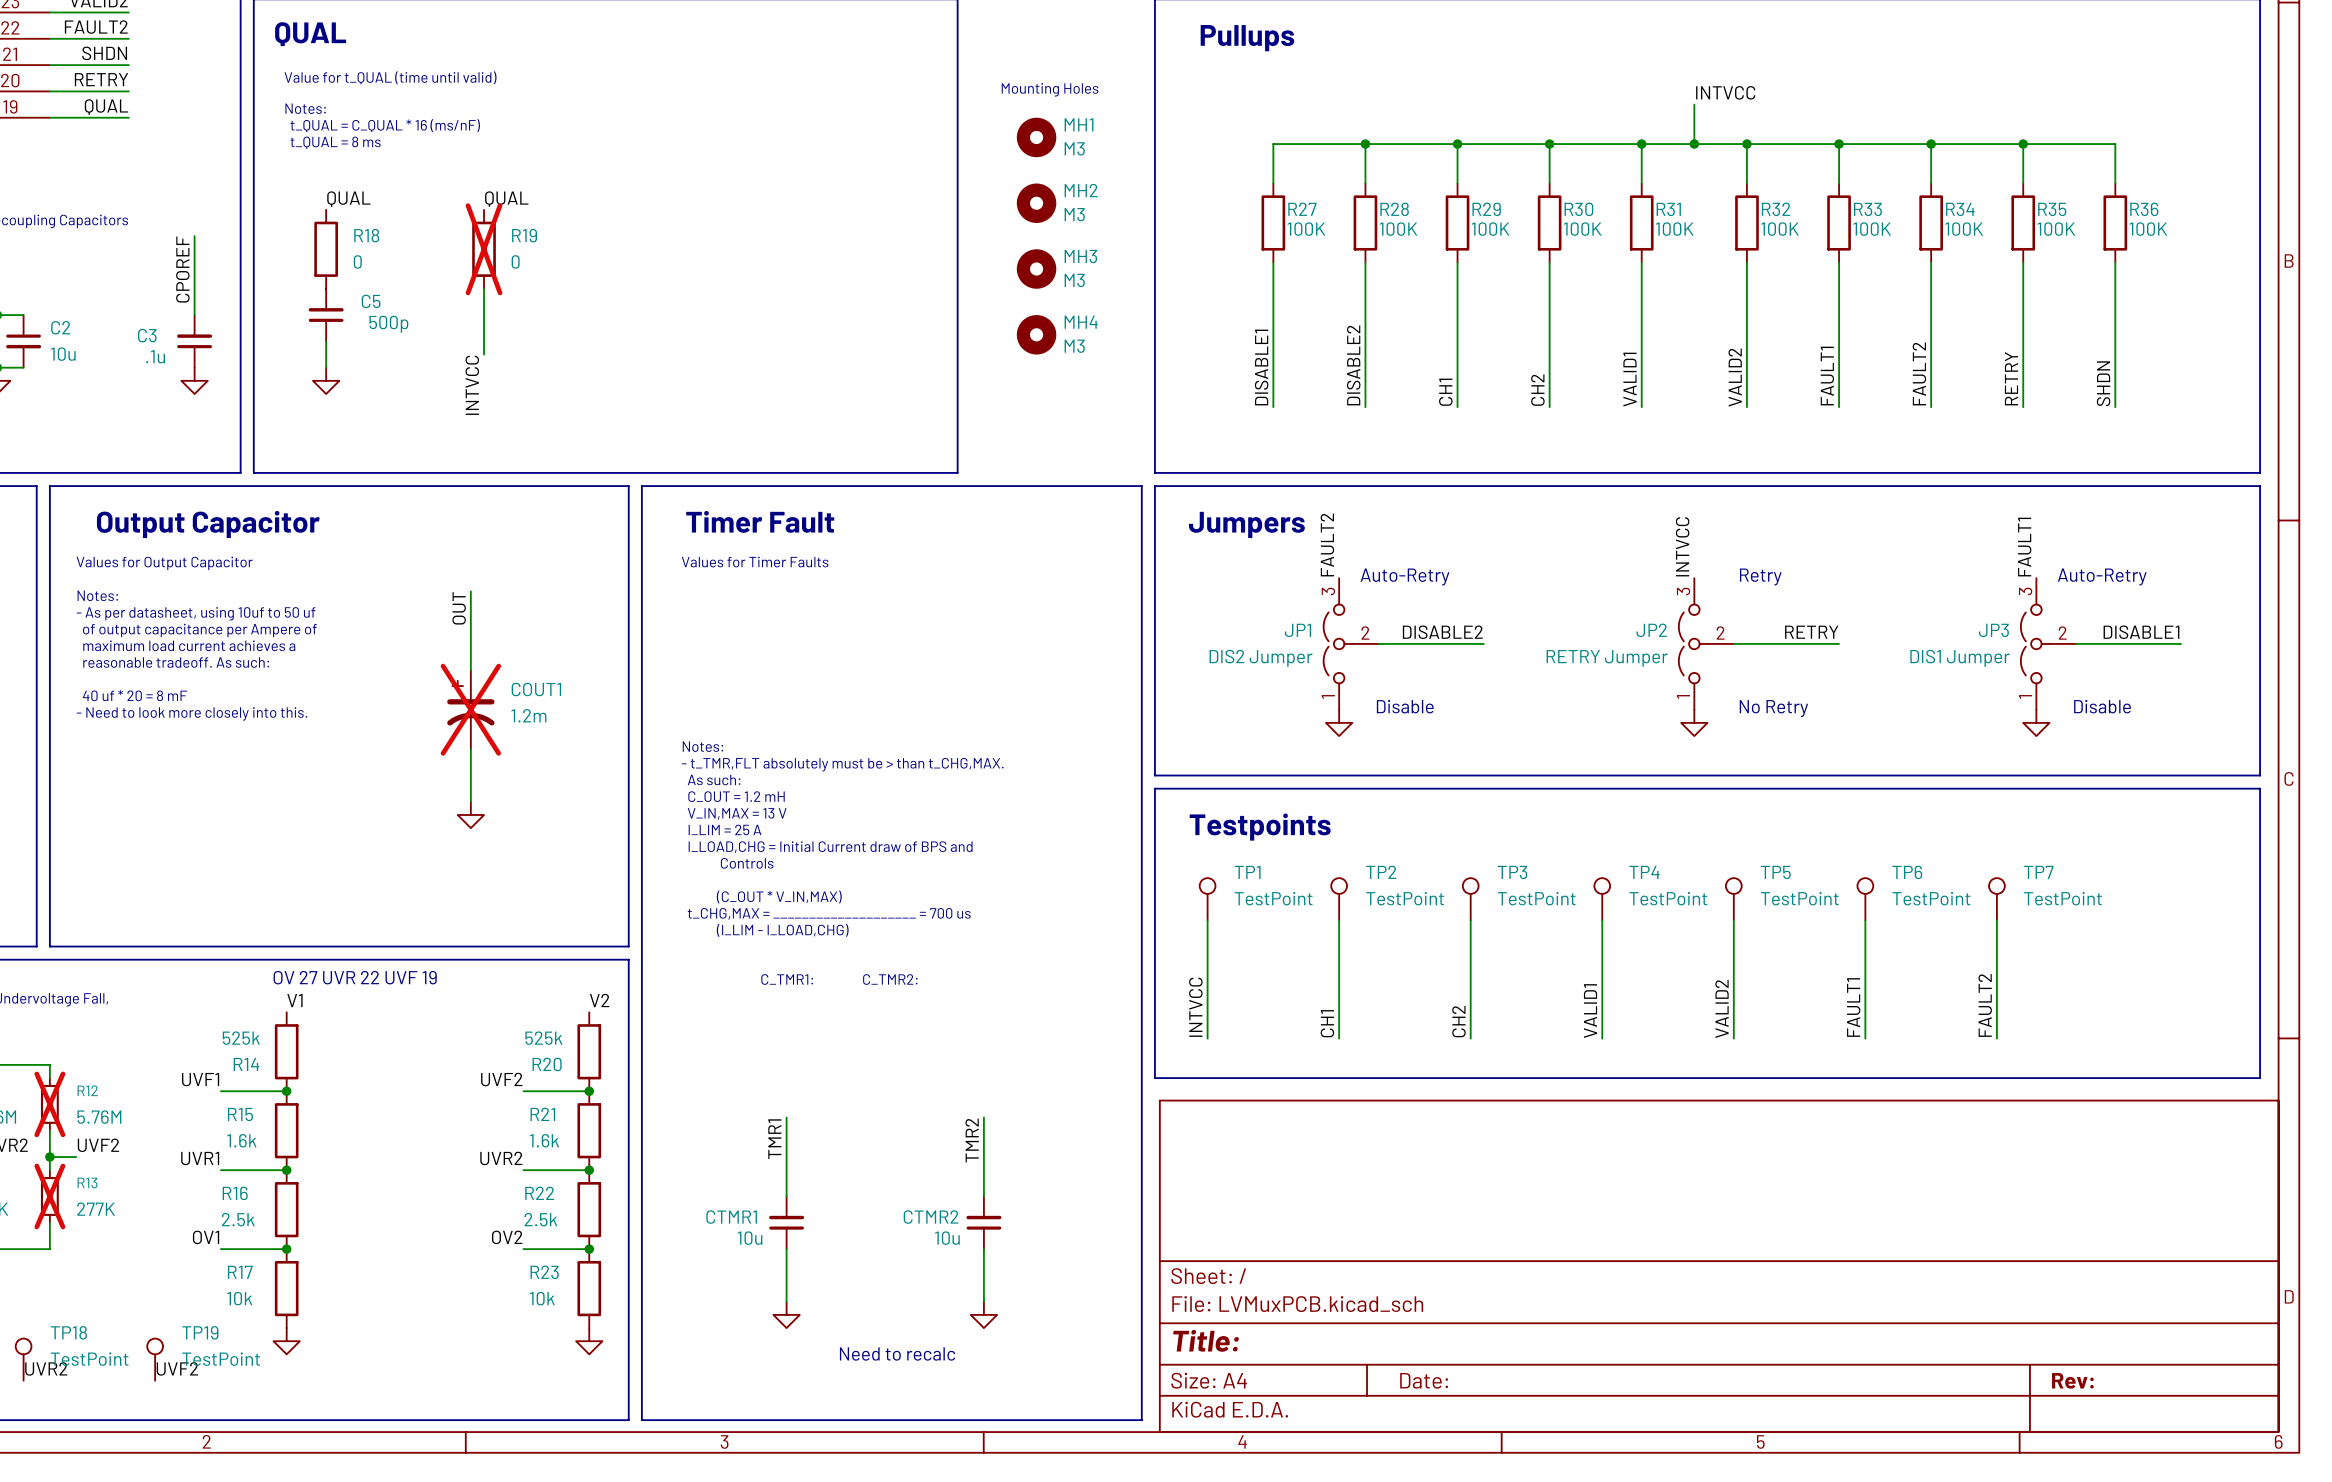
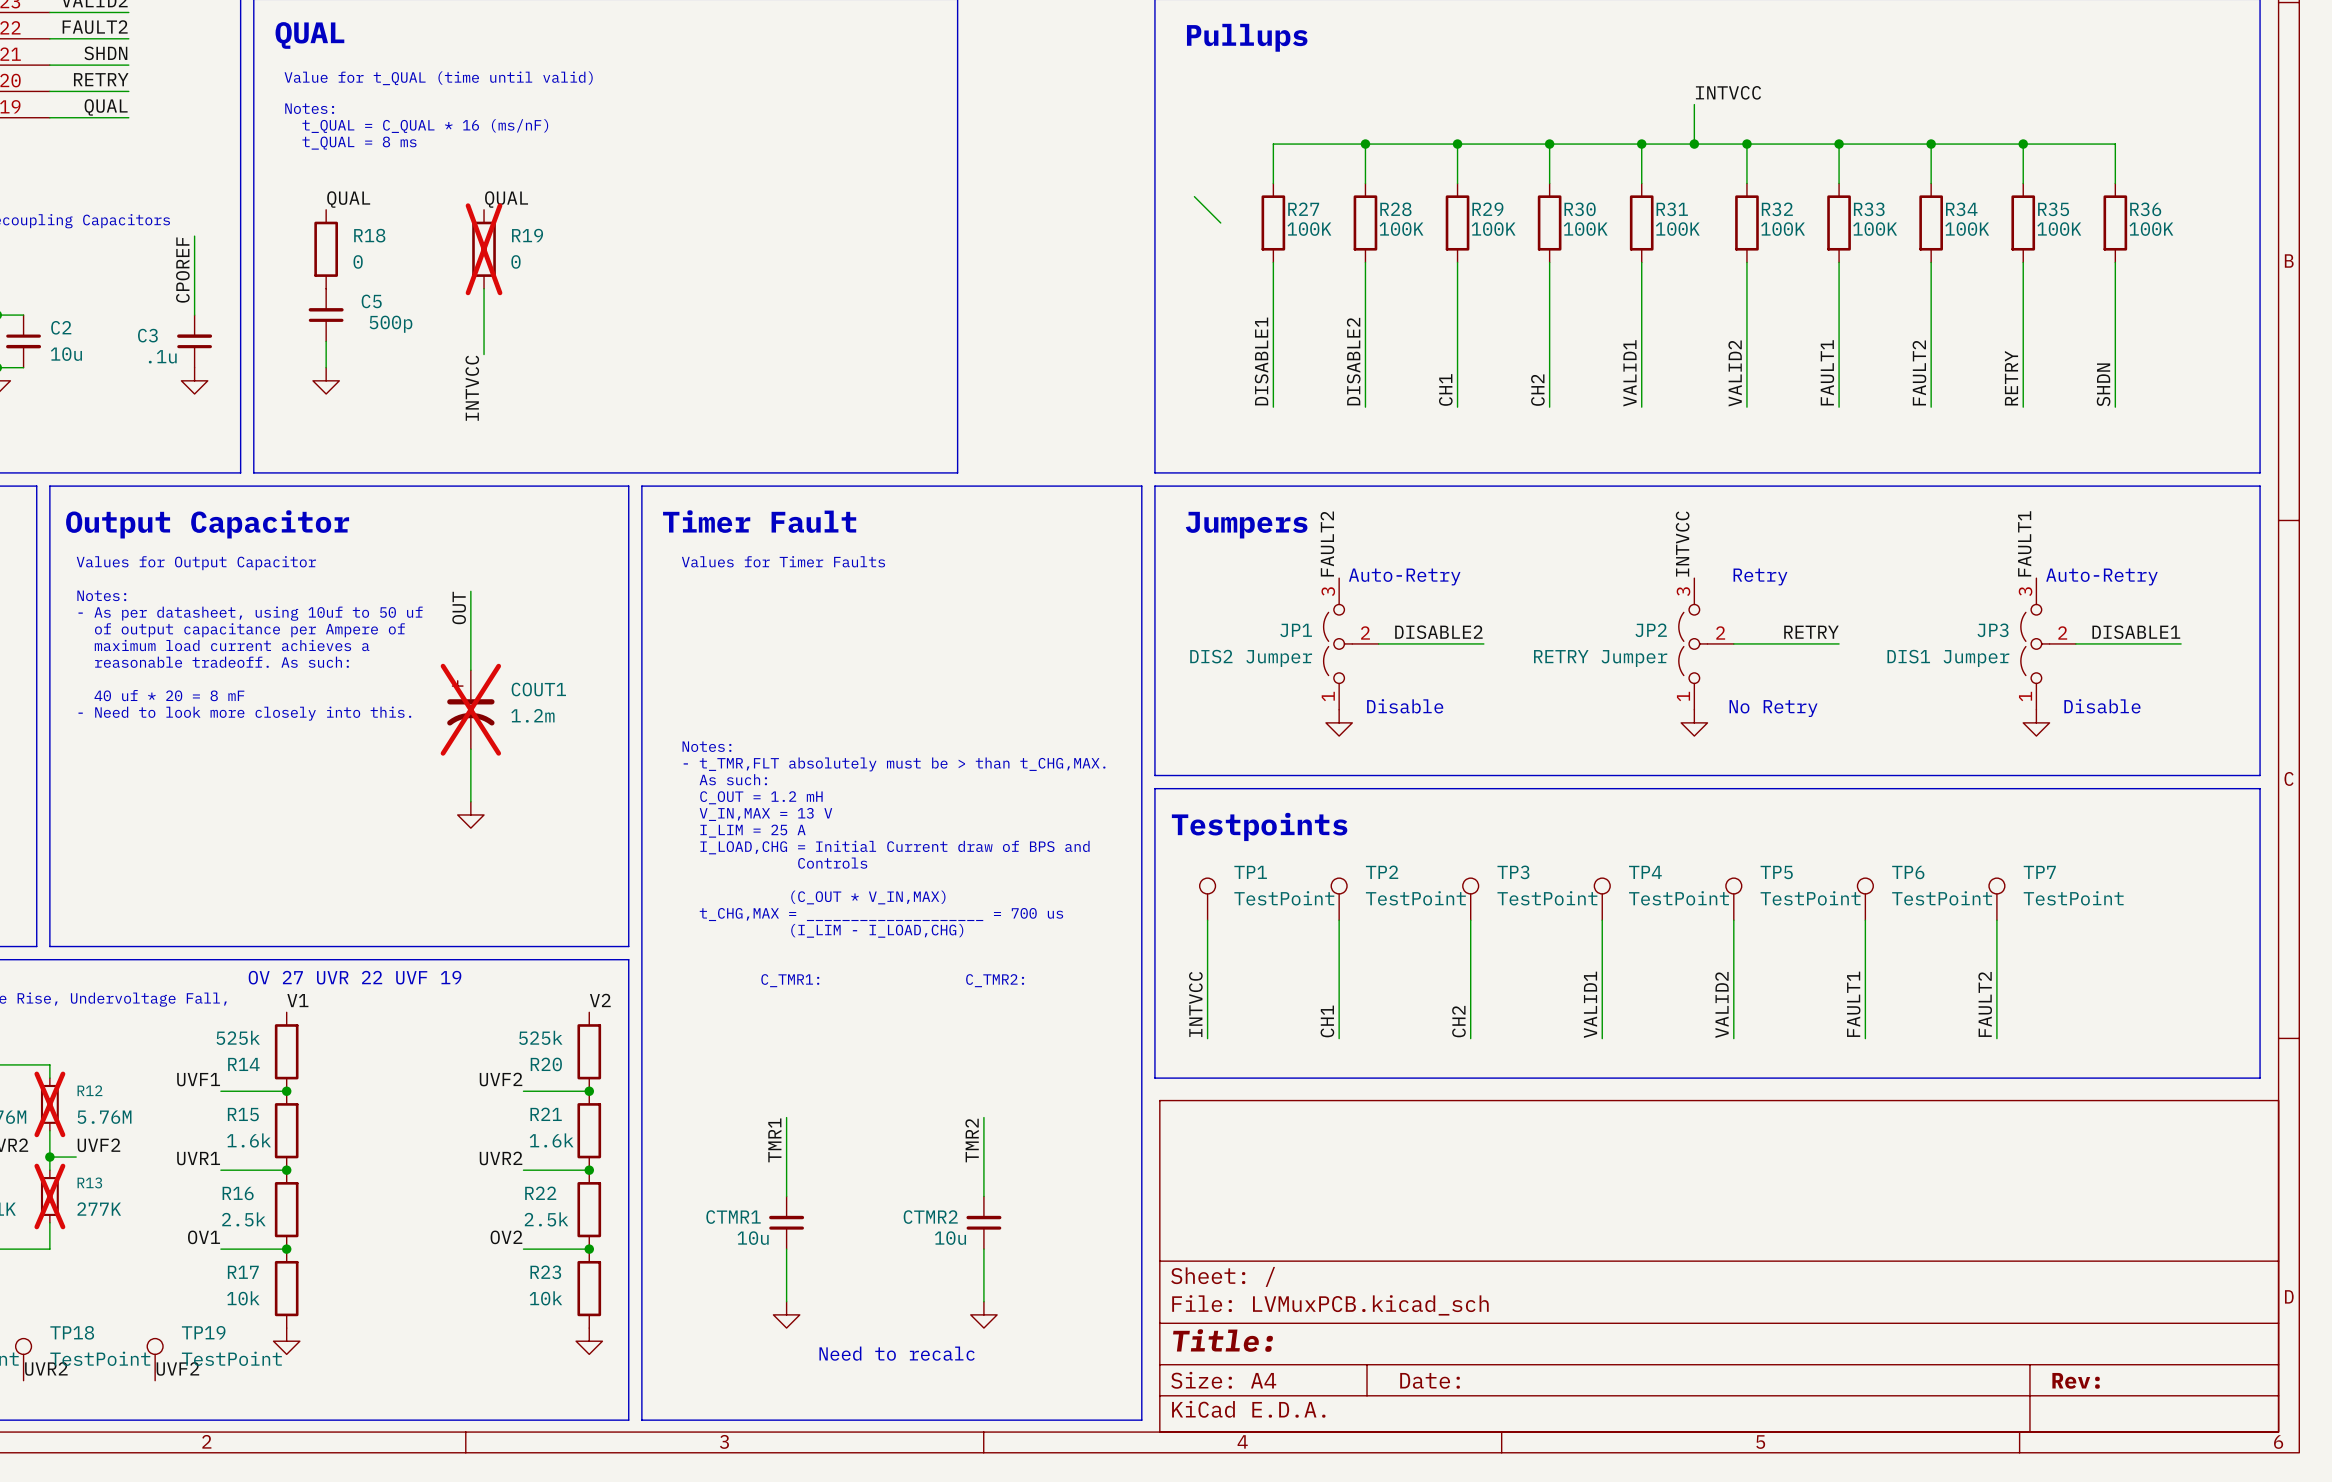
text: Mounting Holes (1050, 89) -> none
MH1: M3 (1036, 137) -> none
wire: none -> (1194, 196) (1220, 222)
MH2: M3 (1036, 203) -> none
MH3: M3 (1036, 269) -> none
MH4: M3 (1036, 334) -> none

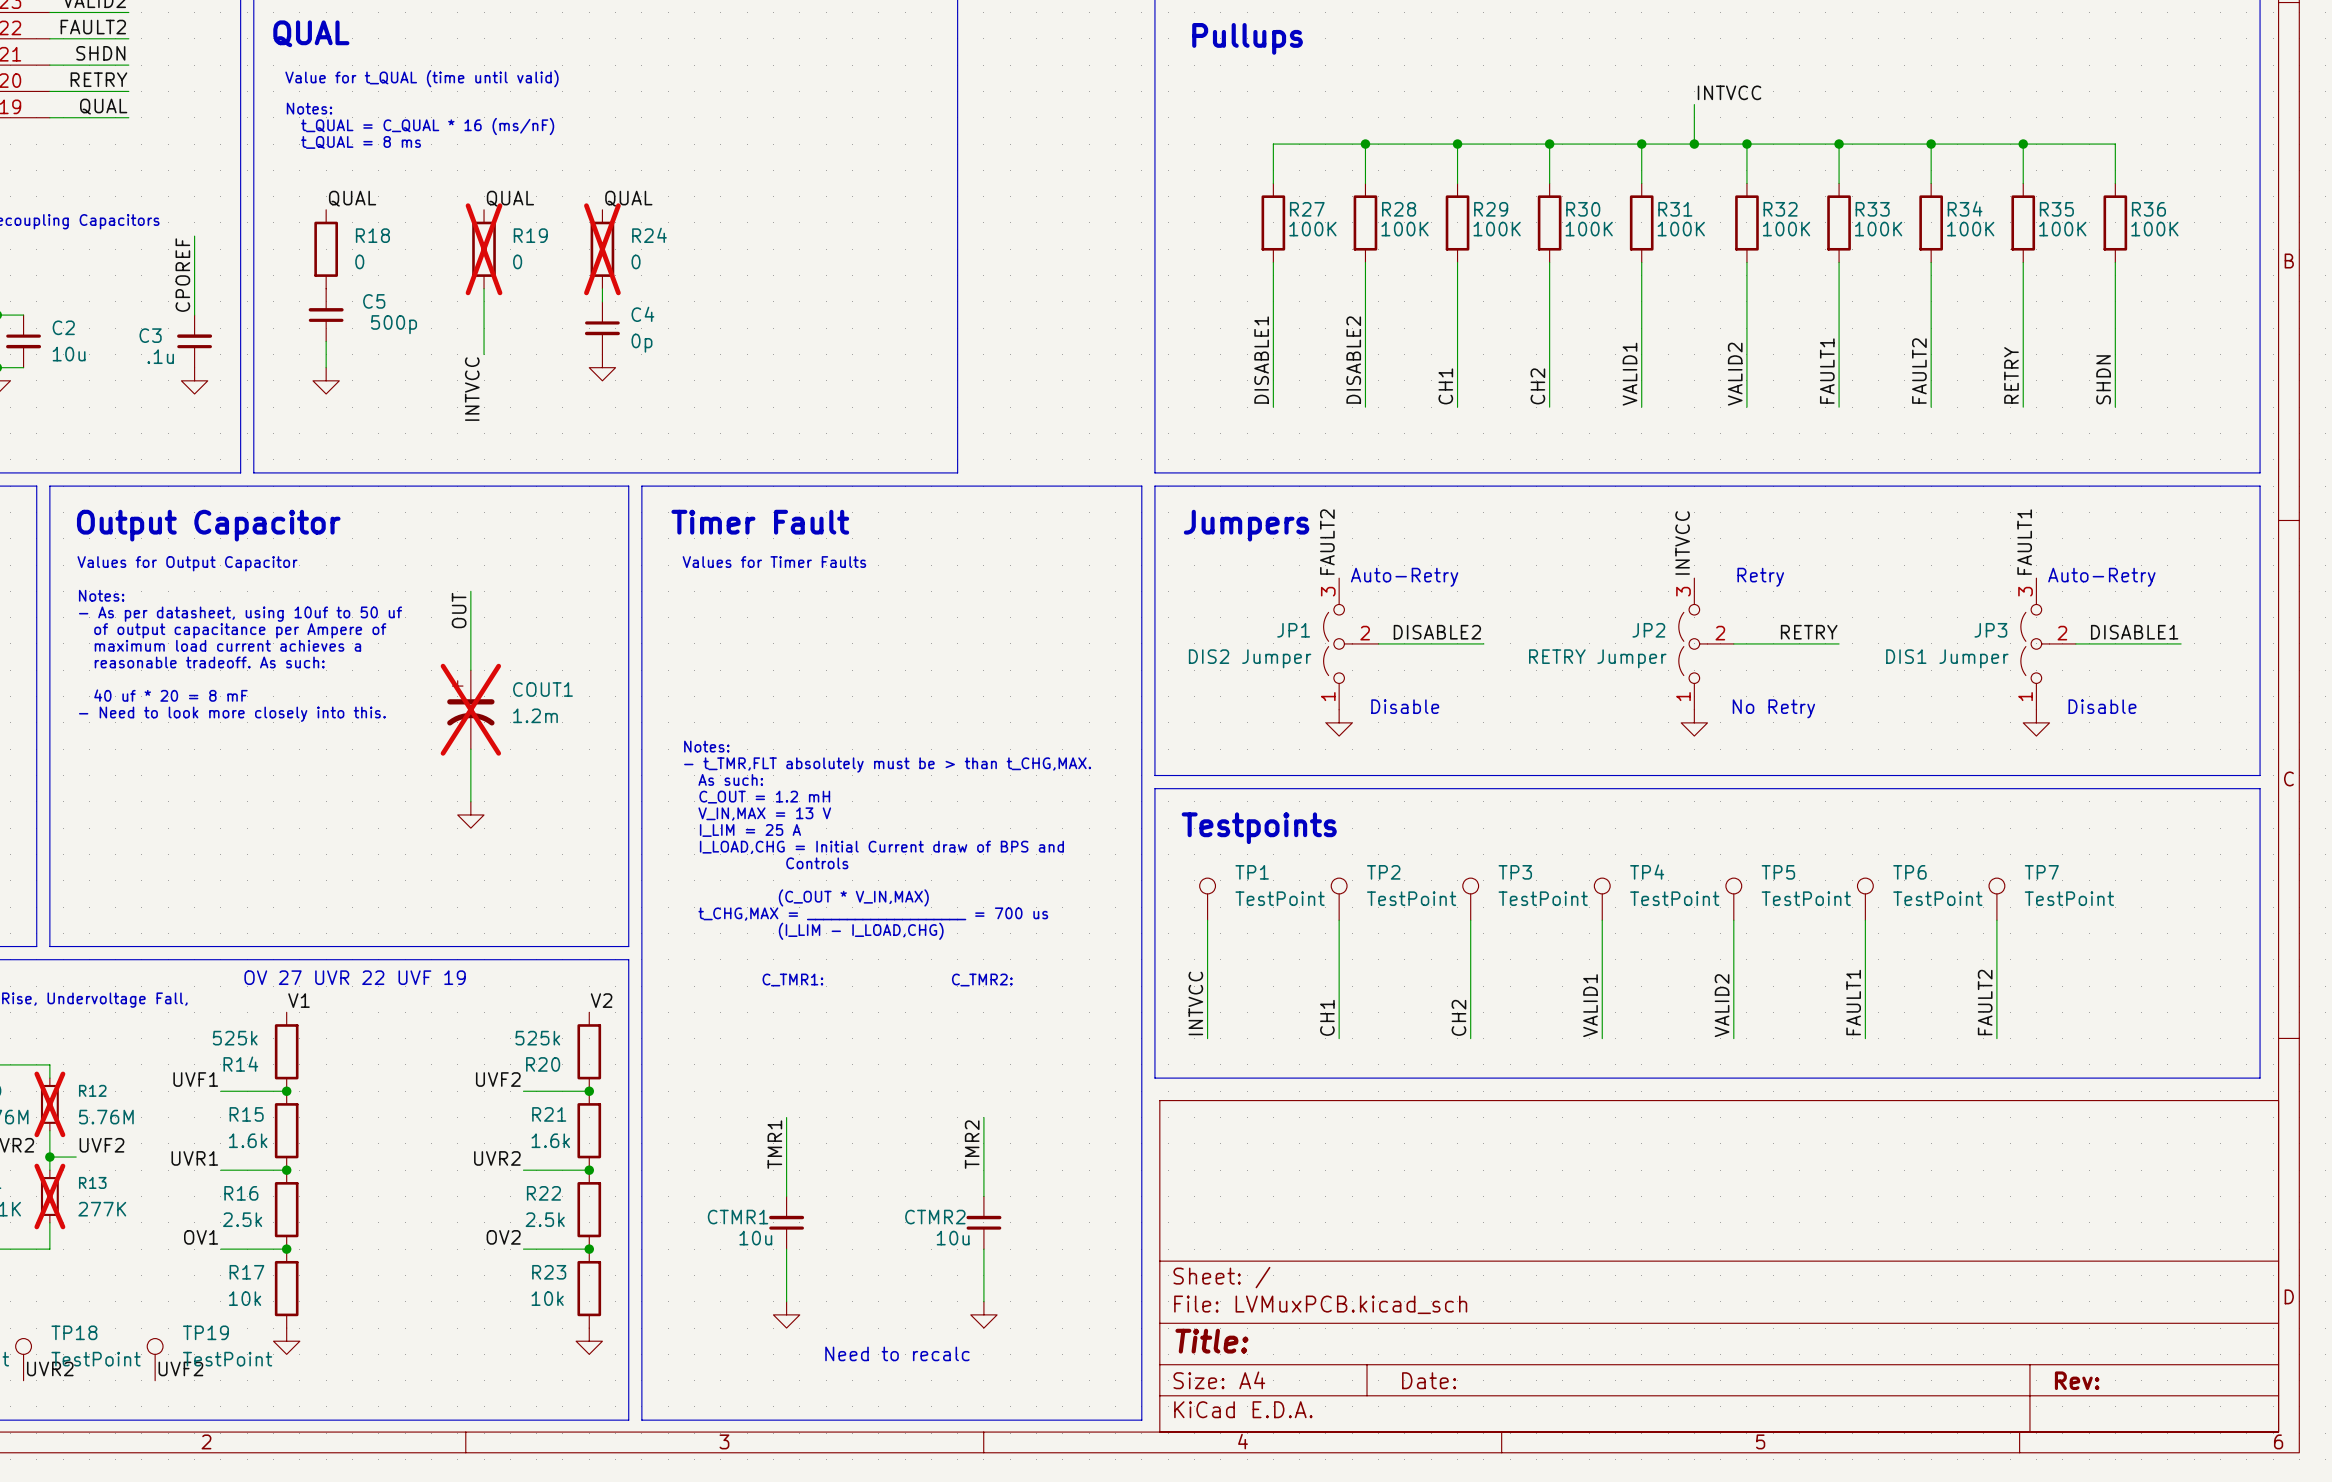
wire: (1194, 196) (1220, 222) -> none
label: none -> QUAL (628, 198)
R24: none -> 0 (602, 249)
wire: none -> (602, 288) (602, 301)
C4: none -> 0p (602, 328)
power symbol: none -> (602, 367)

